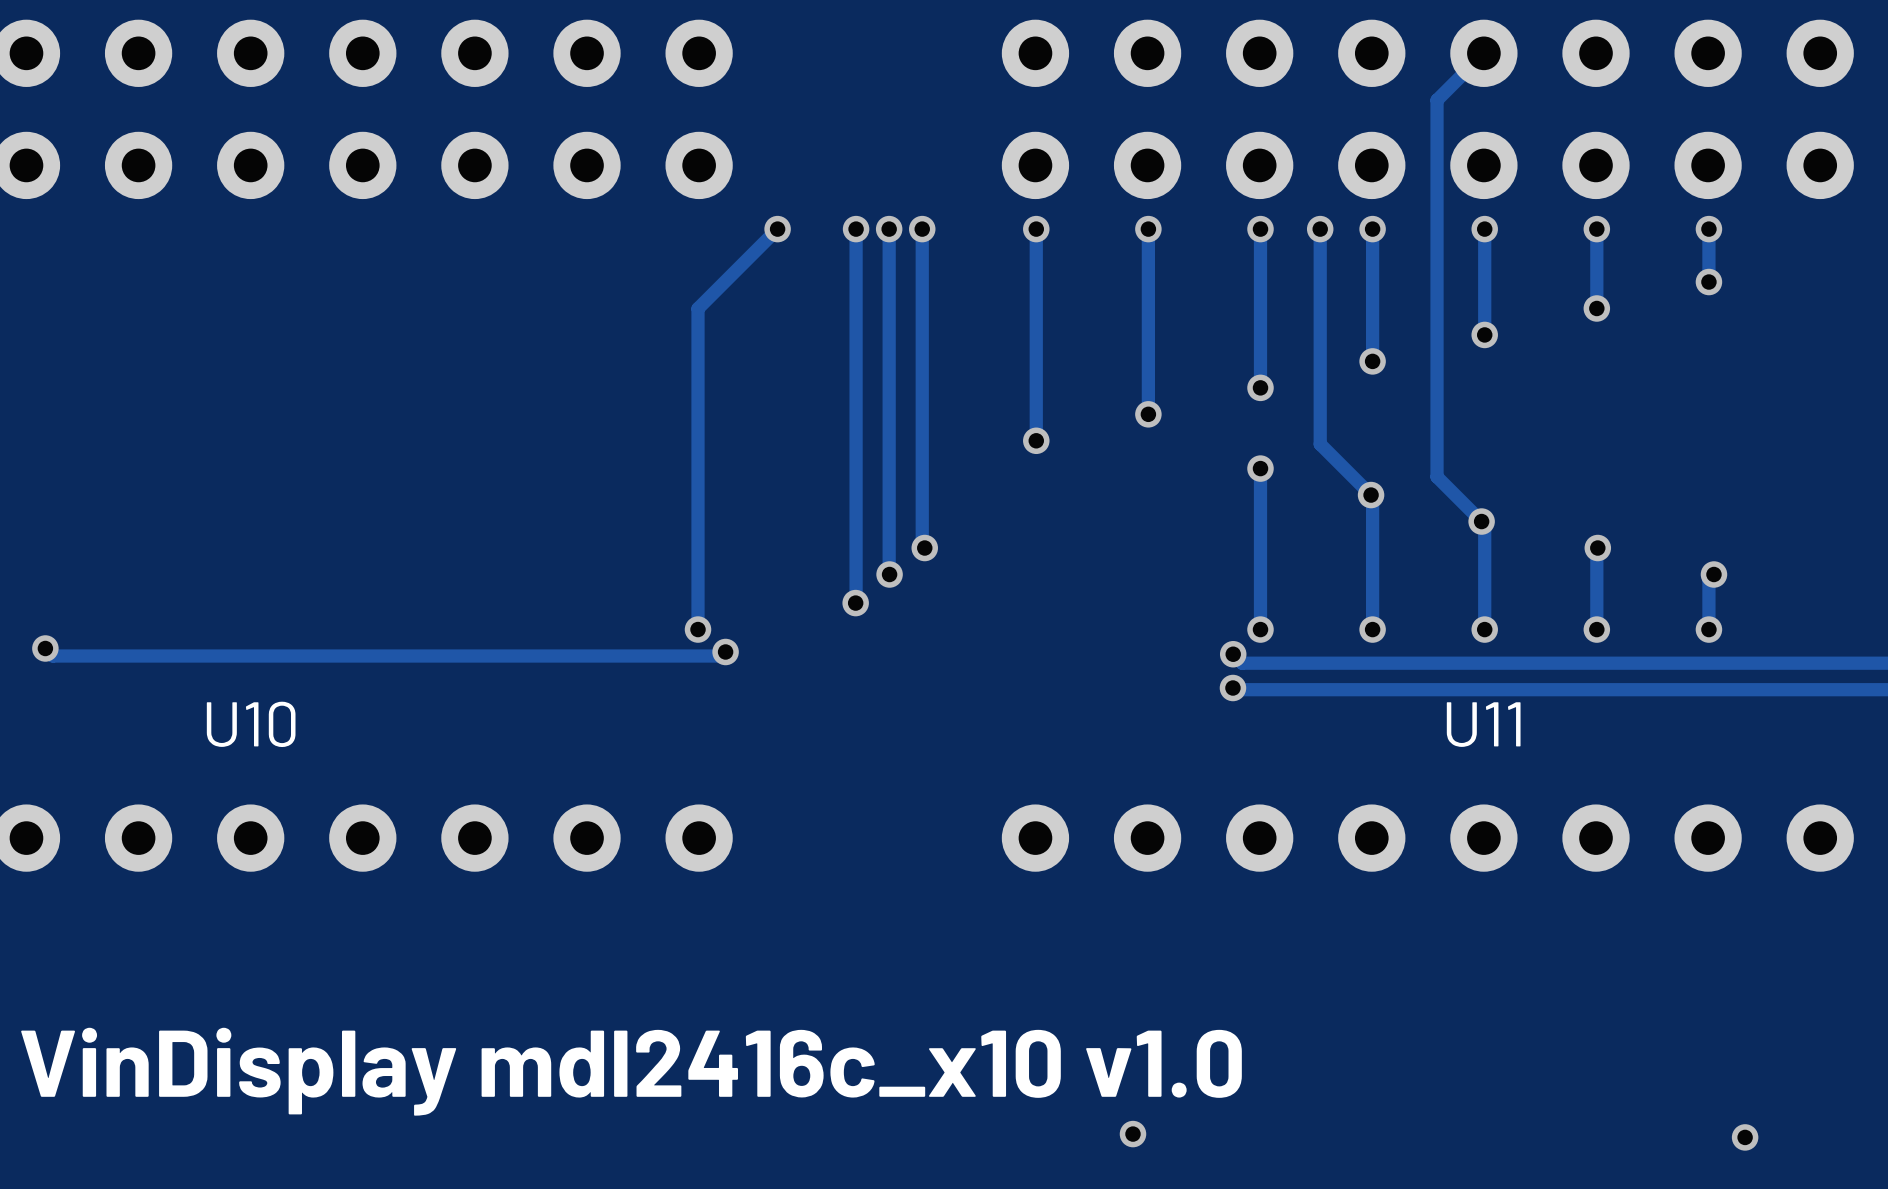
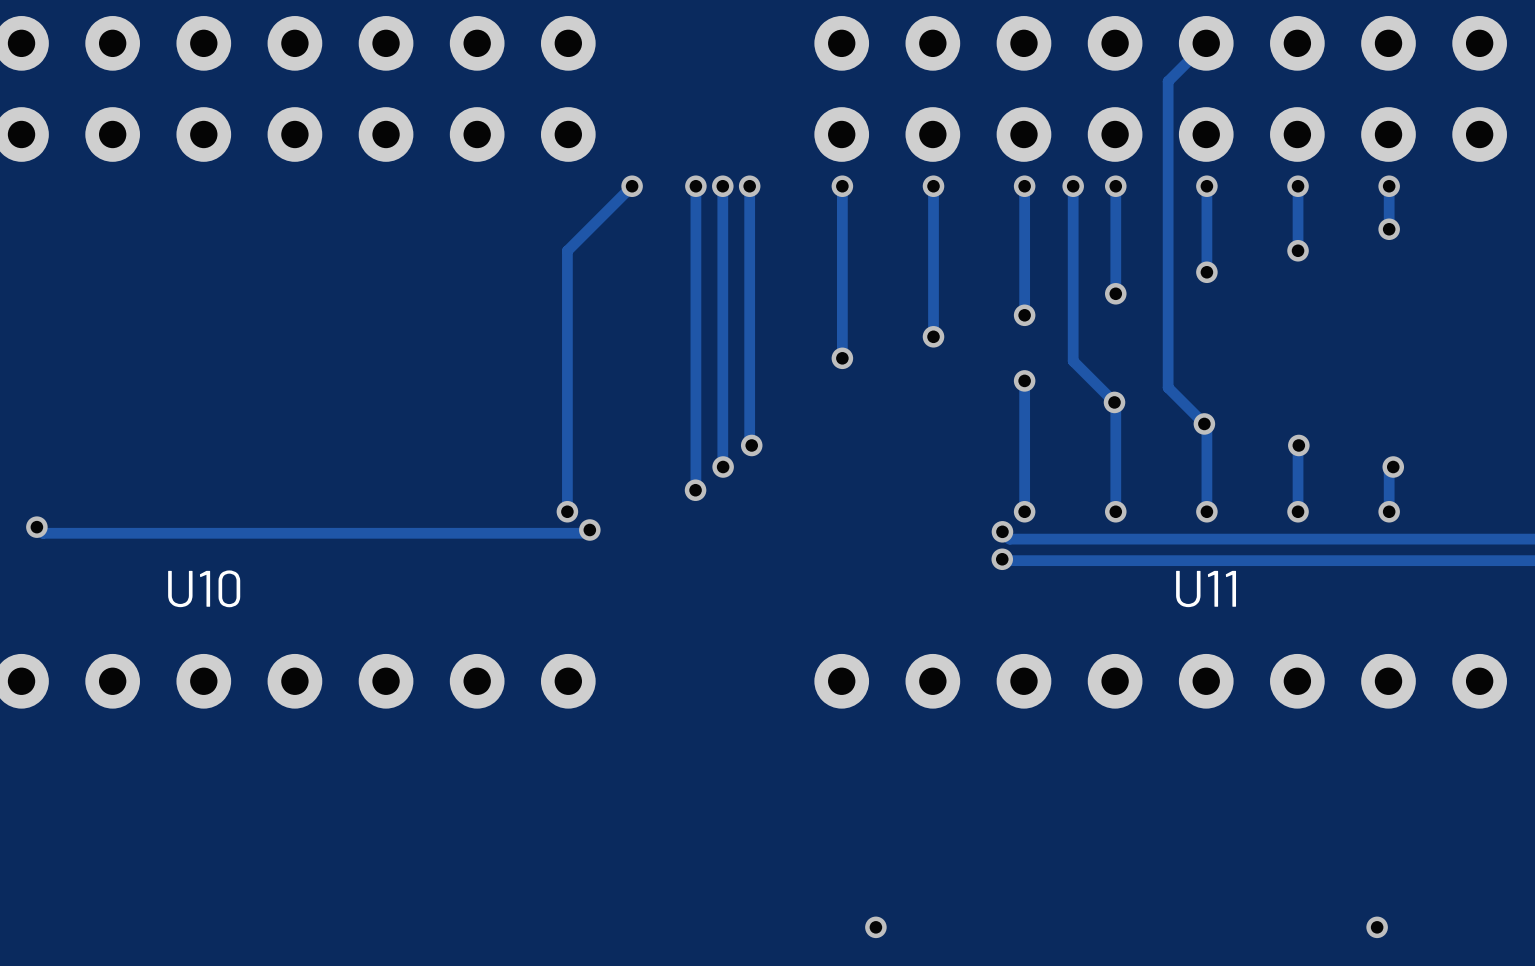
text: VinDisplay mdl2416c_x10 v1.0 (631, 1071) -> none
via position: (1132, 1134) -> (875, 927)
via position: (1745, 1137) -> (1377, 927)

